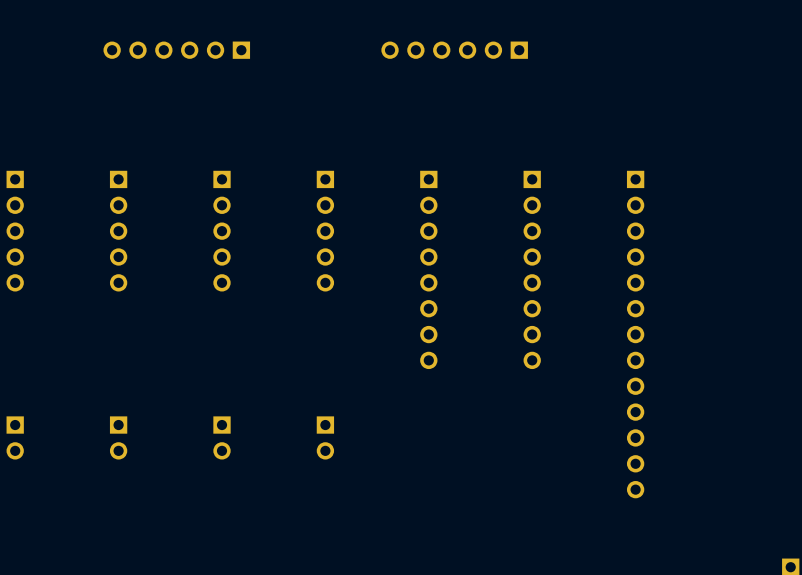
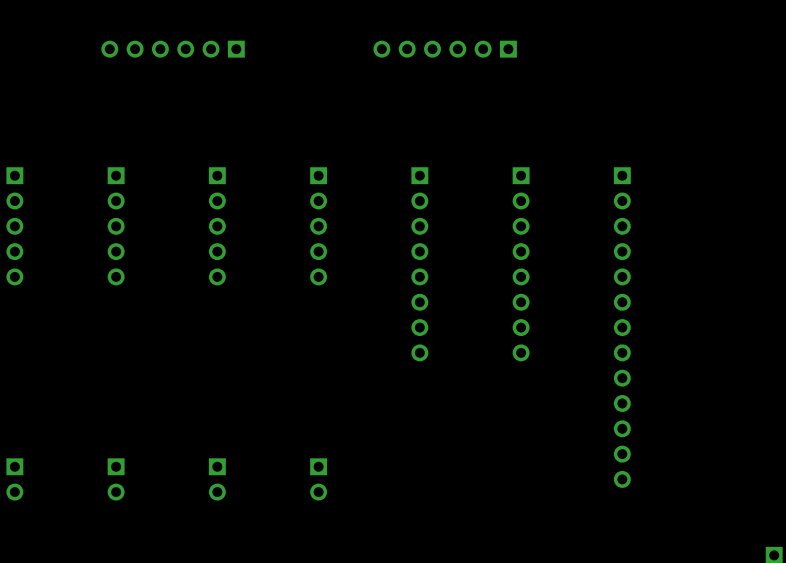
part position: (15, 437) -> (14, 479)
part position: (118, 437) -> (116, 479)
part position: (222, 437) -> (217, 479)
part position: (325, 437) -> (318, 479)

